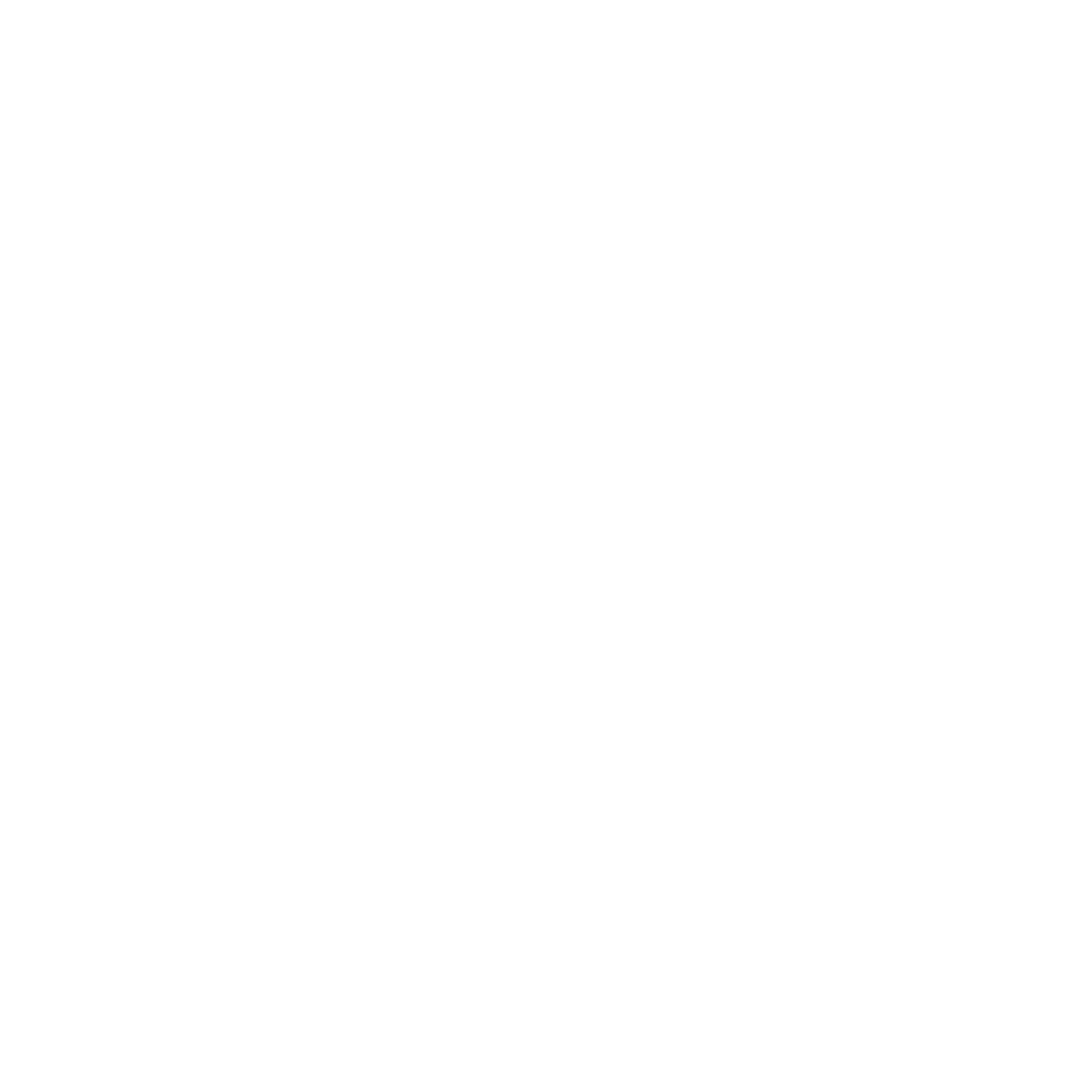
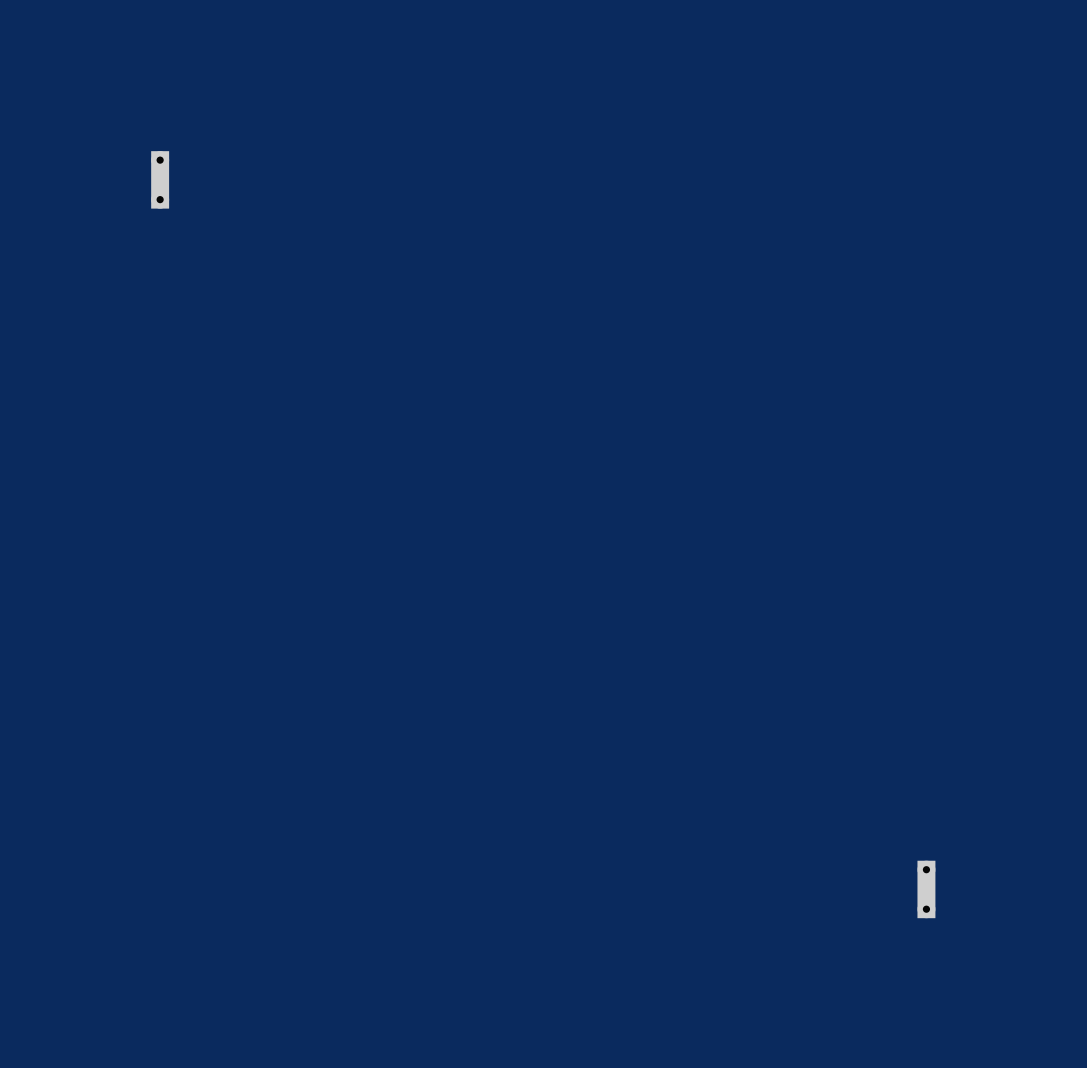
part: none -> (160, 179)
part: none -> (926, 889)

